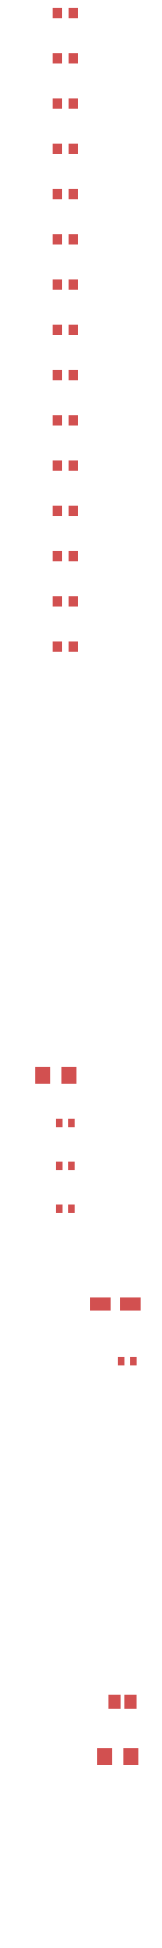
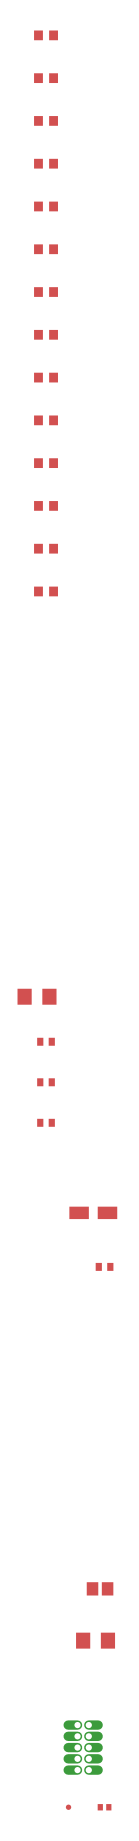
part: none -> (83, 1747)
part: none -> (68, 1807)
part: none -> (104, 1807)

